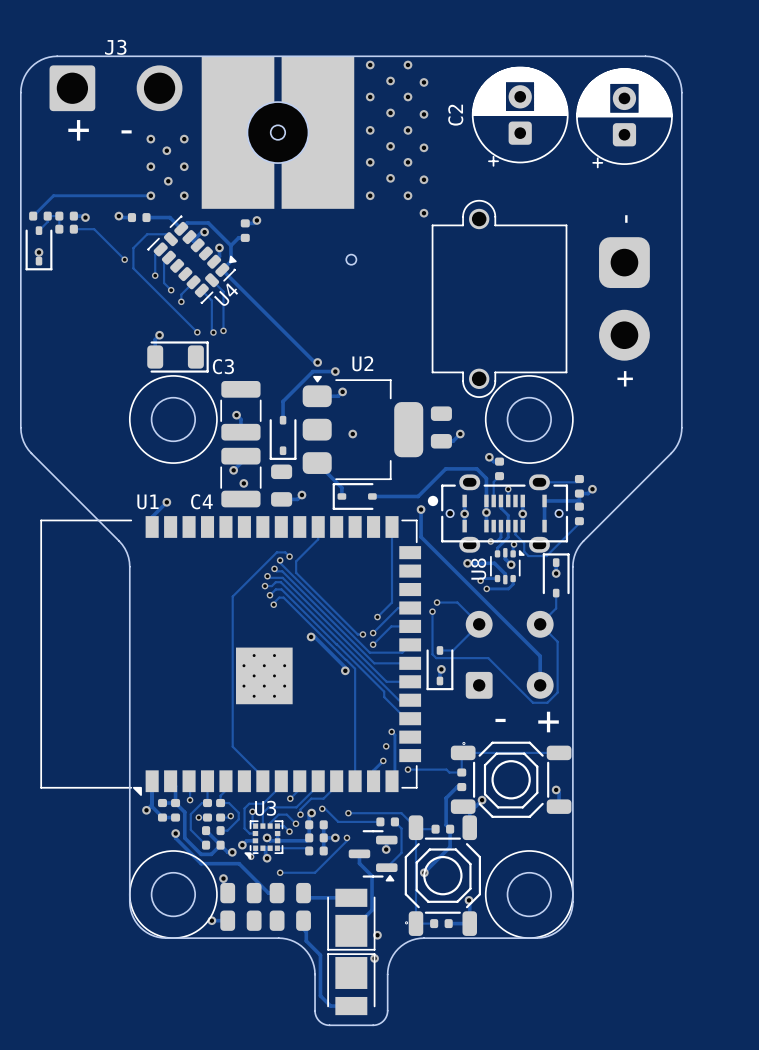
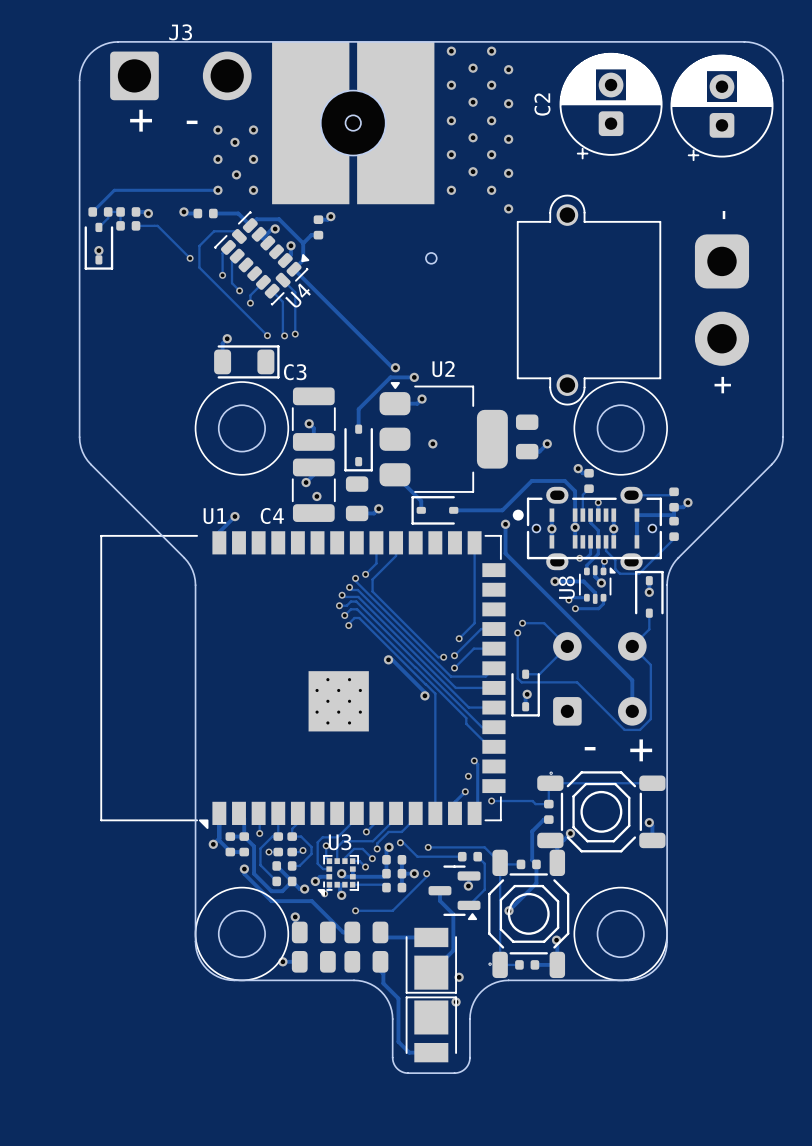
track: (289, 556) (285, 552) (276, 552) (232, 596) (232, 746) (262, 776) (262, 781) -> (365, 574) (376, 563) (376, 542)

